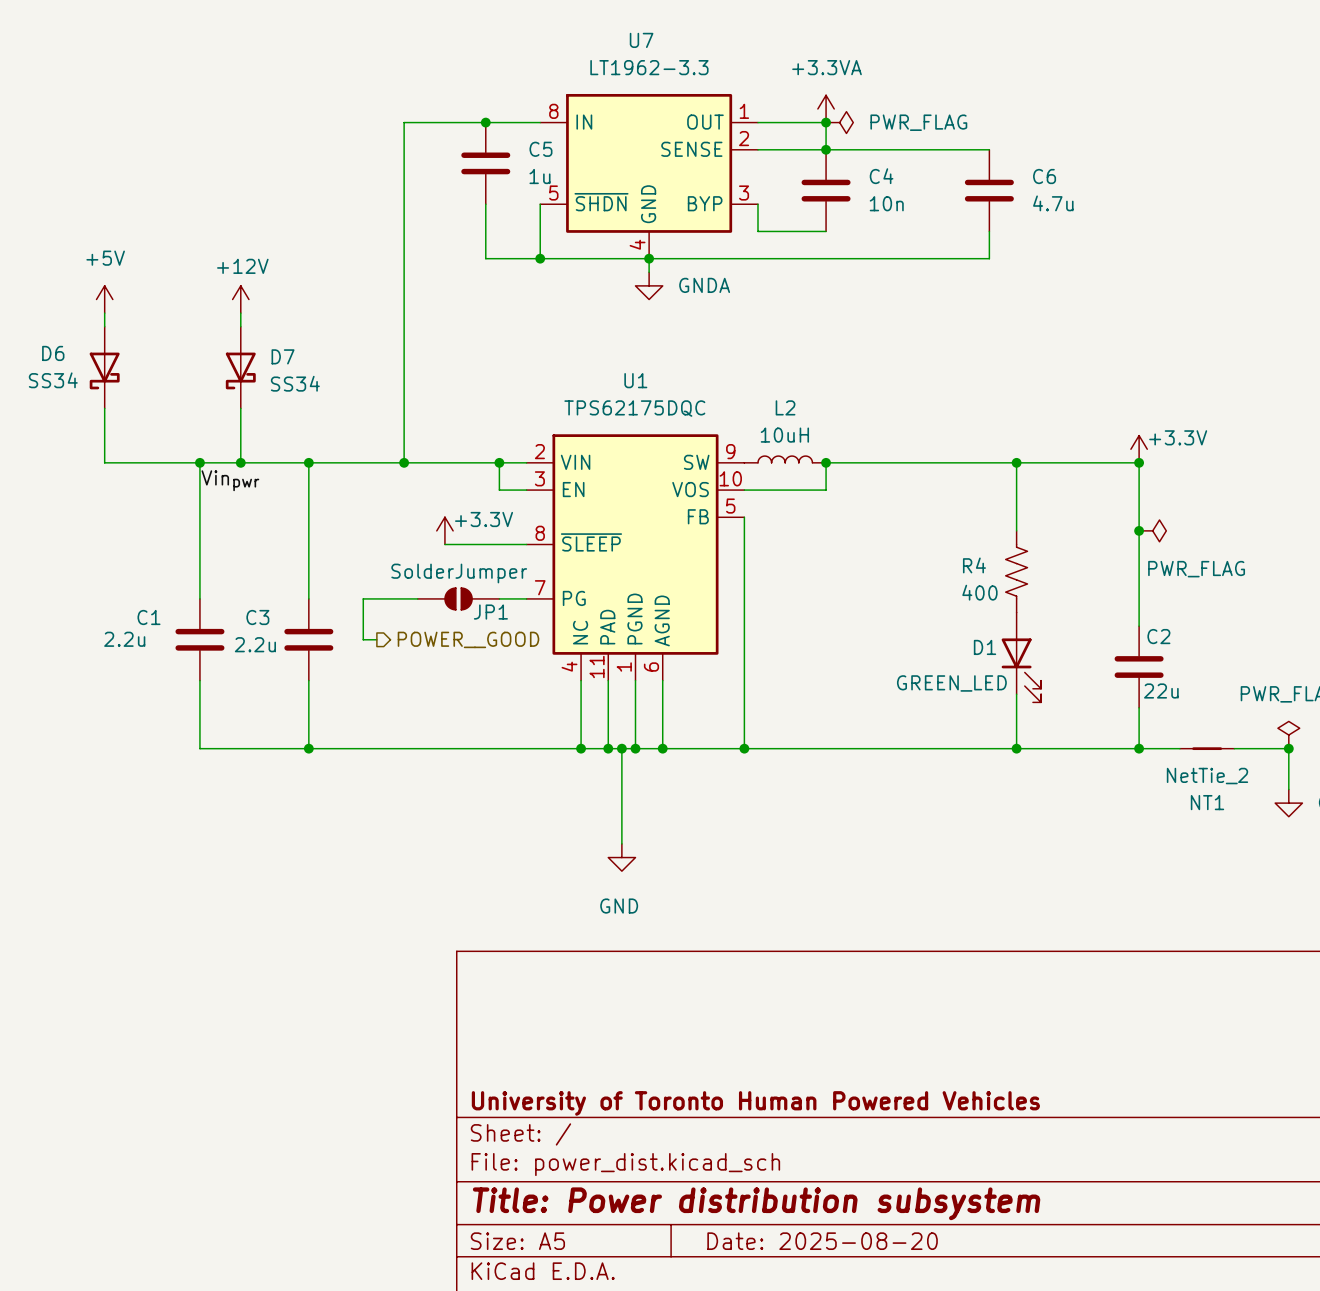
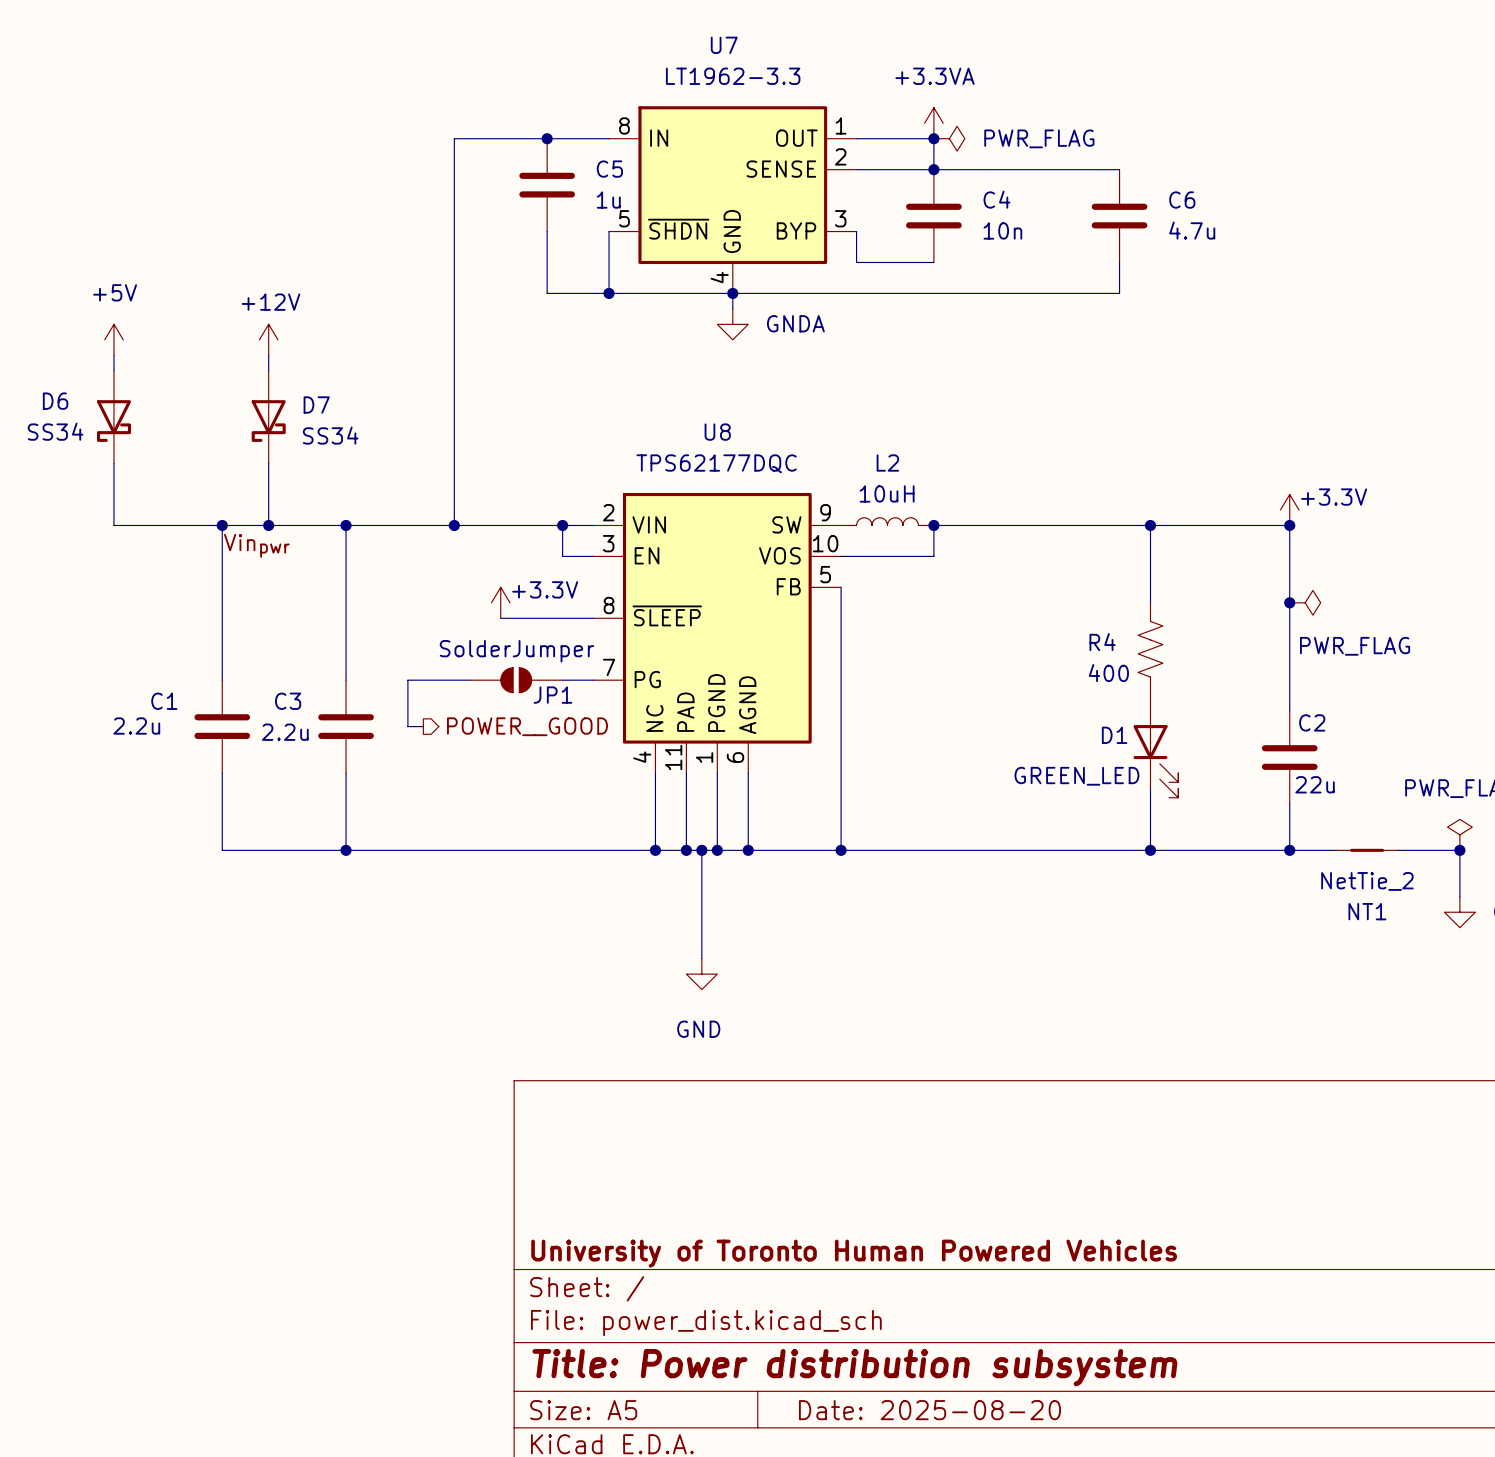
U1 name: U1 (635, 380) -> U8 (717, 432)
U1 value: TPS62175DQC (634, 408) -> TPS62177DQC (716, 463)

